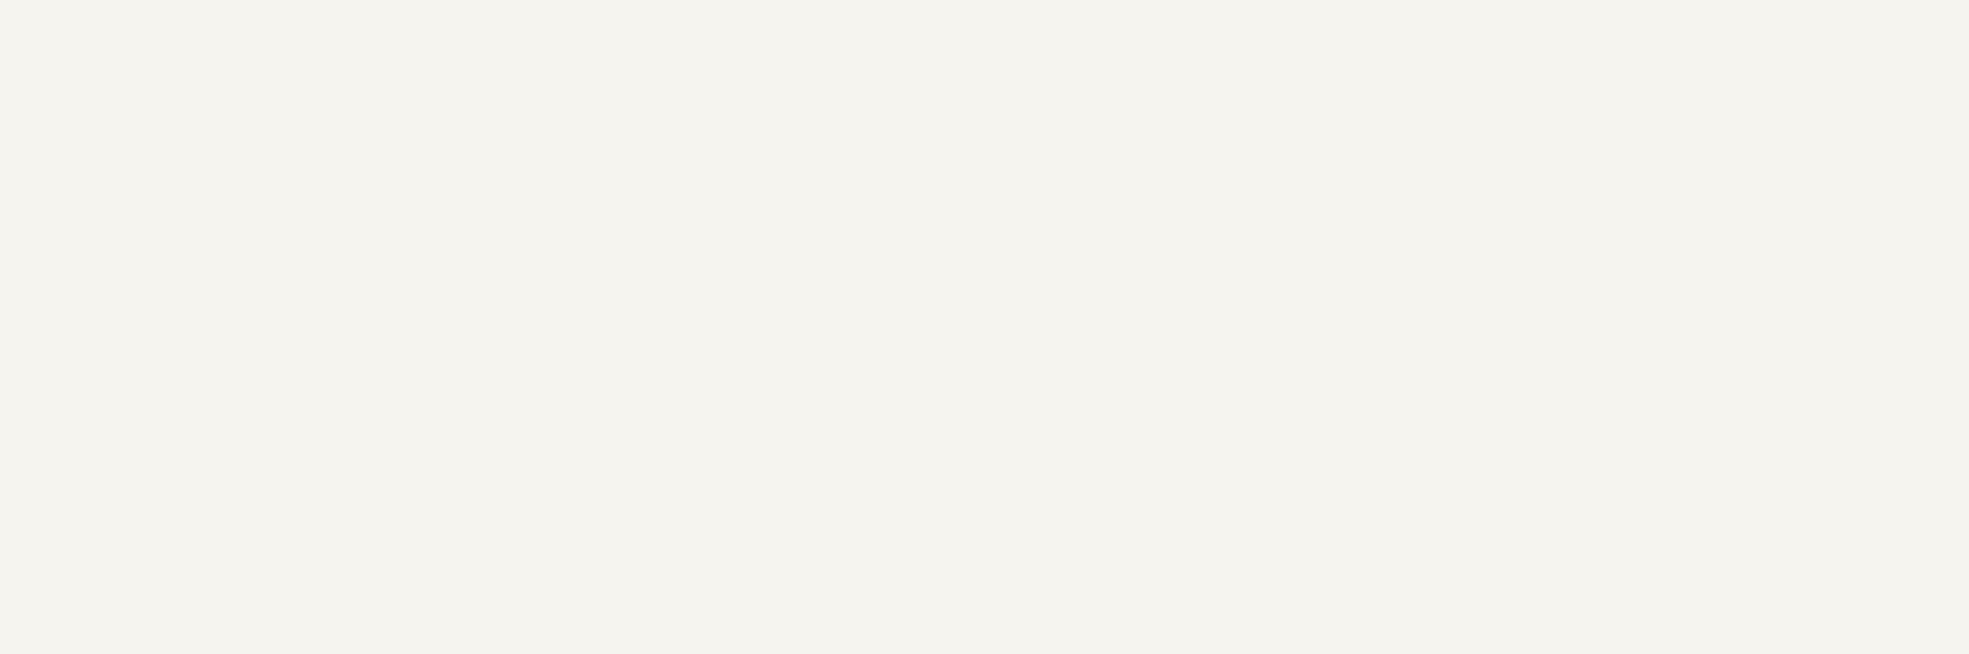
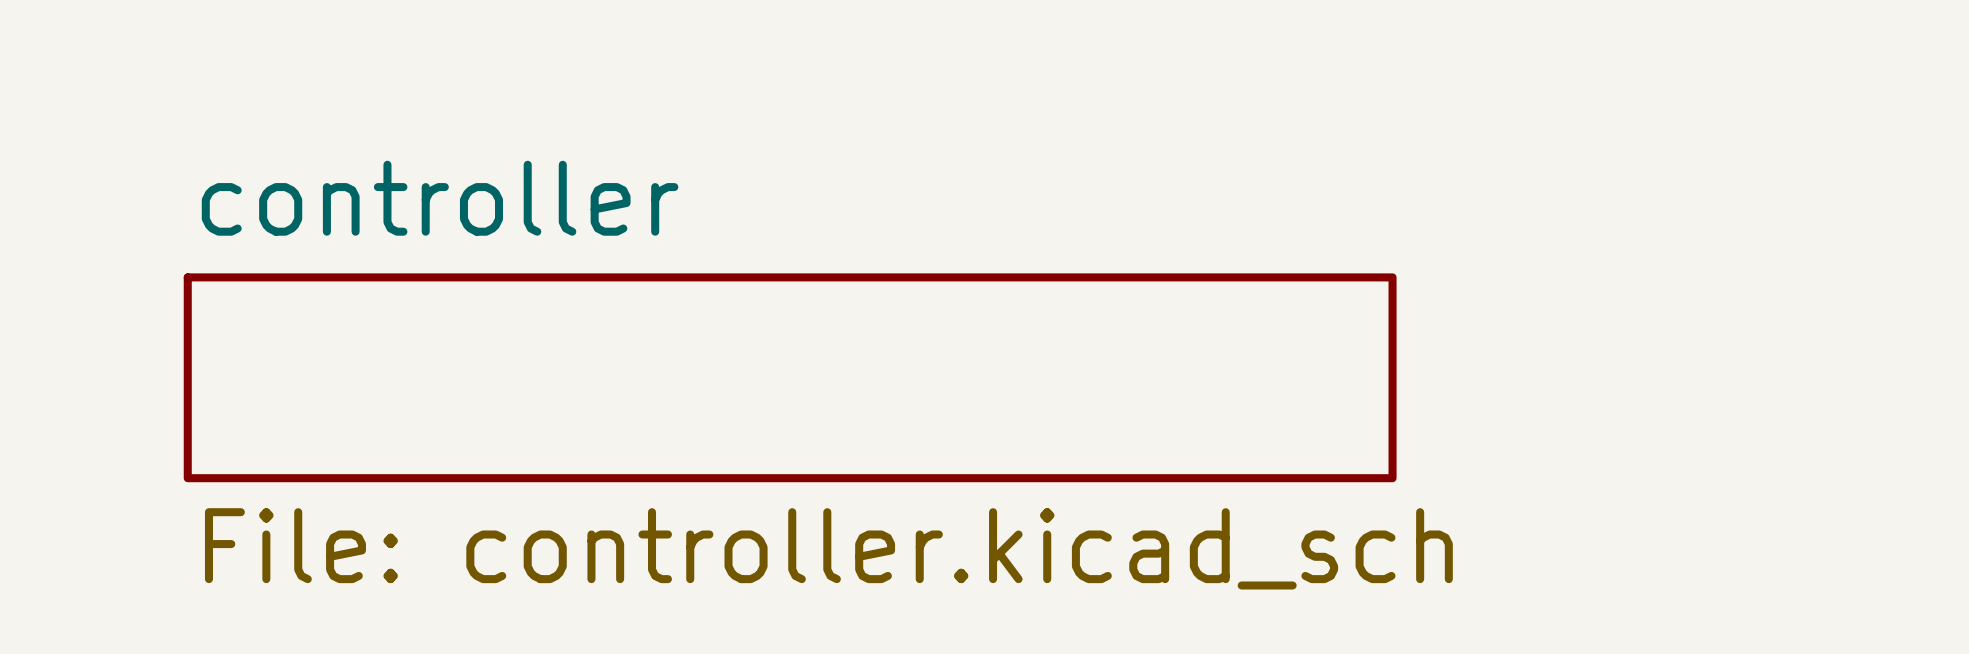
sheet controller: none -> File: controller.kicad_sch (790, 377)

